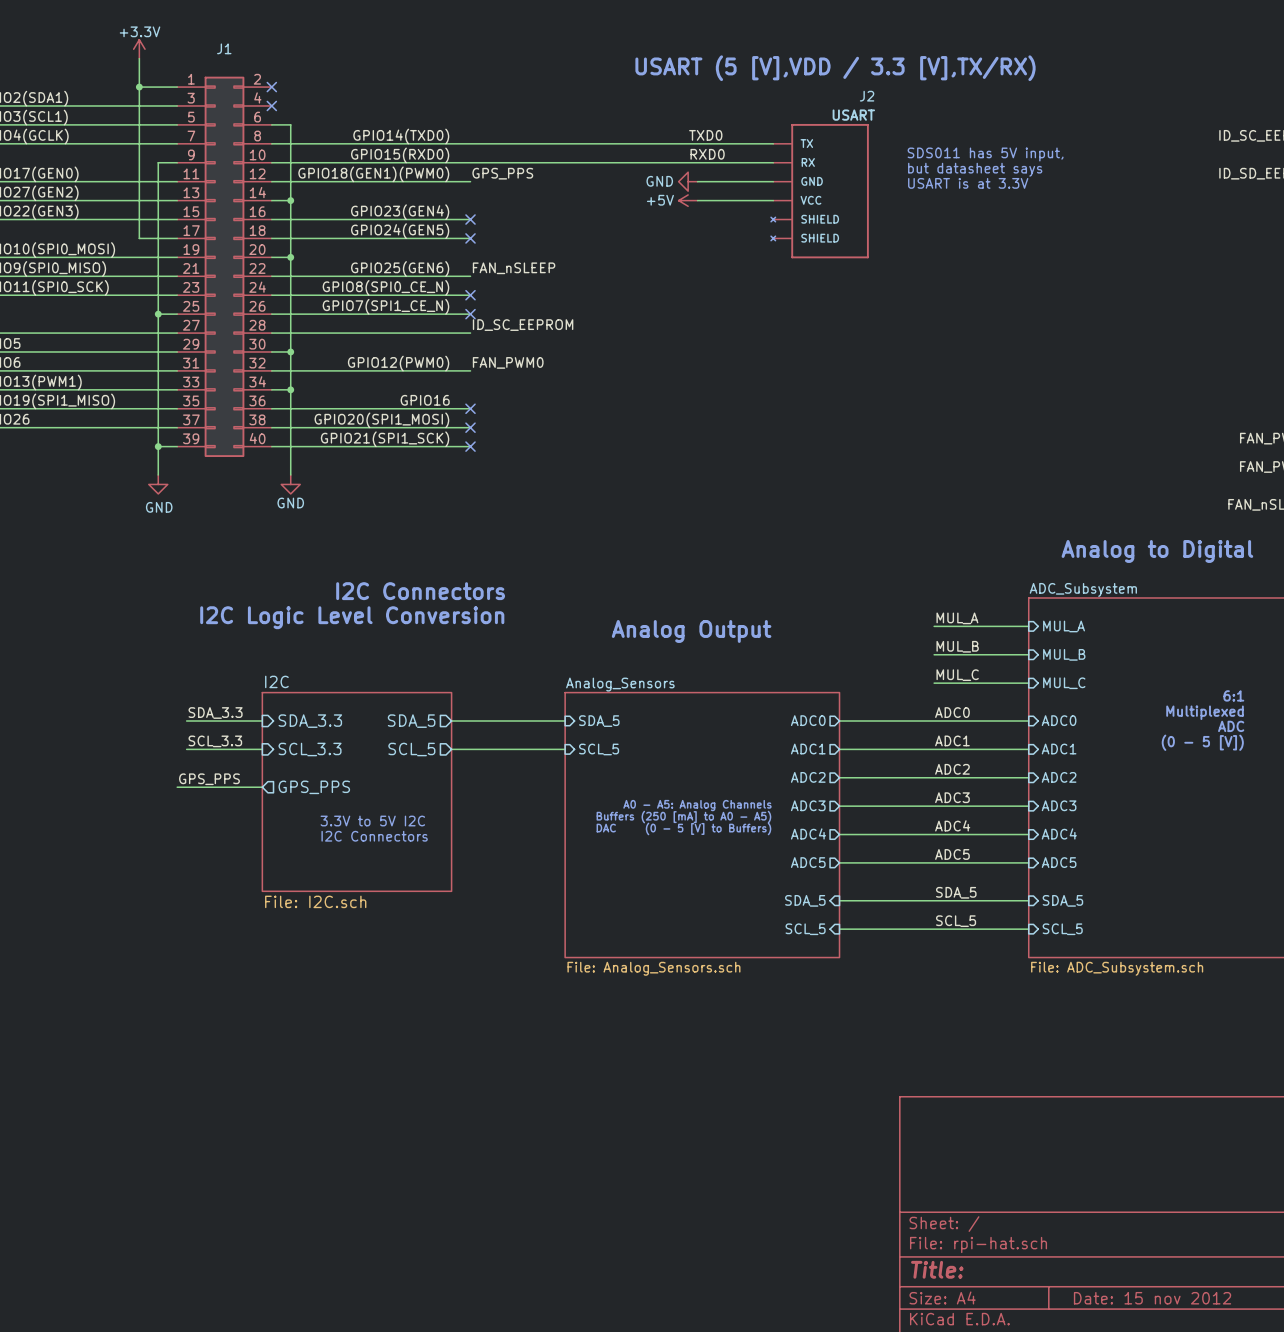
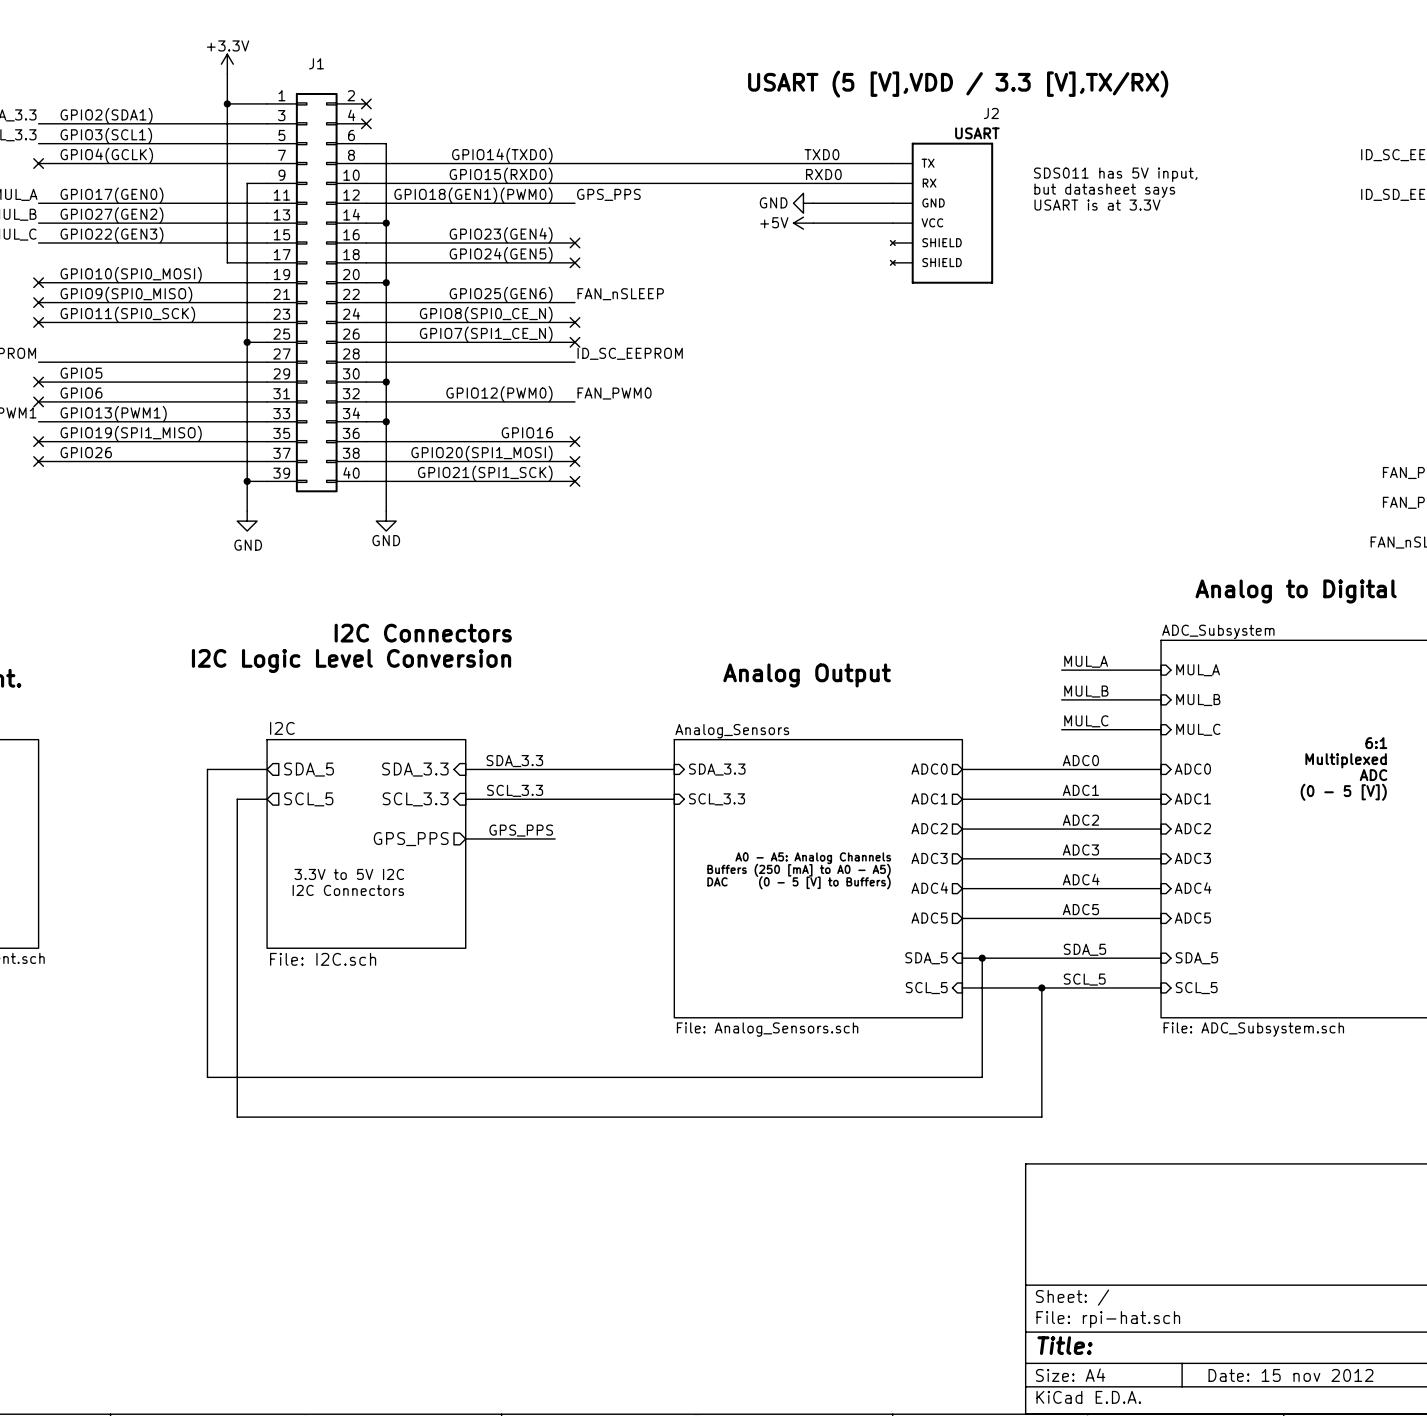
text position: I2C Connectors (420, 591) -> I2C Connectors (423, 633)
text position: I2C Logic Level Conversion (352, 617) -> I2C Logic Level Conversion (351, 661)
label: SDA_3.3 (215, 713) -> none
label: none -> SDA_3.3 (514, 761)
wire: none -> (267, 769) (207, 769) (207, 1077) (982, 1077) (982, 958)
wire: (186, 720) (262, 720) -> none
wire: none -> (465, 769) (555, 769)
sheet pin: none -> SDA_5 (309, 769)
sheet pin rotation: 0° (310, 721) -> 180° (415, 769)
sheet pin: SDA_5 (411, 721) -> none
sheet pin: SDA_5 (599, 721) -> SDA_3.3 (717, 769)
label: SCL_3.3 (215, 741) -> none
label: none -> SCL_3.3 (515, 790)
wire: none -> (267, 799) (237, 799) (237, 1117) (1041, 1117) (1041, 987)
wire: (186, 749) (262, 749) -> none
sheet pin: none -> SCL_5 (308, 799)
sheet pin rotation: 0° (310, 749) -> 180° (415, 799)
wire: none -> (465, 799) (555, 799)
sheet pin: SCL_5 (411, 749) -> none
sheet pin: SCL_5 (599, 749) -> SCL_3.3 (717, 799)
label: GPS_PPS (209, 779) -> none
label: none -> GPS_PPS (521, 830)
wire: (177, 787) (262, 787) -> none
sheet pin rotation: 0° (314, 787) -> 180° (411, 839)
wire: none -> (465, 838) (555, 838)
sheet I2C position: (356, 791) -> (366, 843)
text position: 3.3V to 5V I2C (372, 821) -> 3.3V to 5V I2C (349, 874)
text position: I2C Connectors (374, 836) -> I2C Connectors (348, 890)
junction: none -> (982, 958)
junction: none -> (1041, 987)

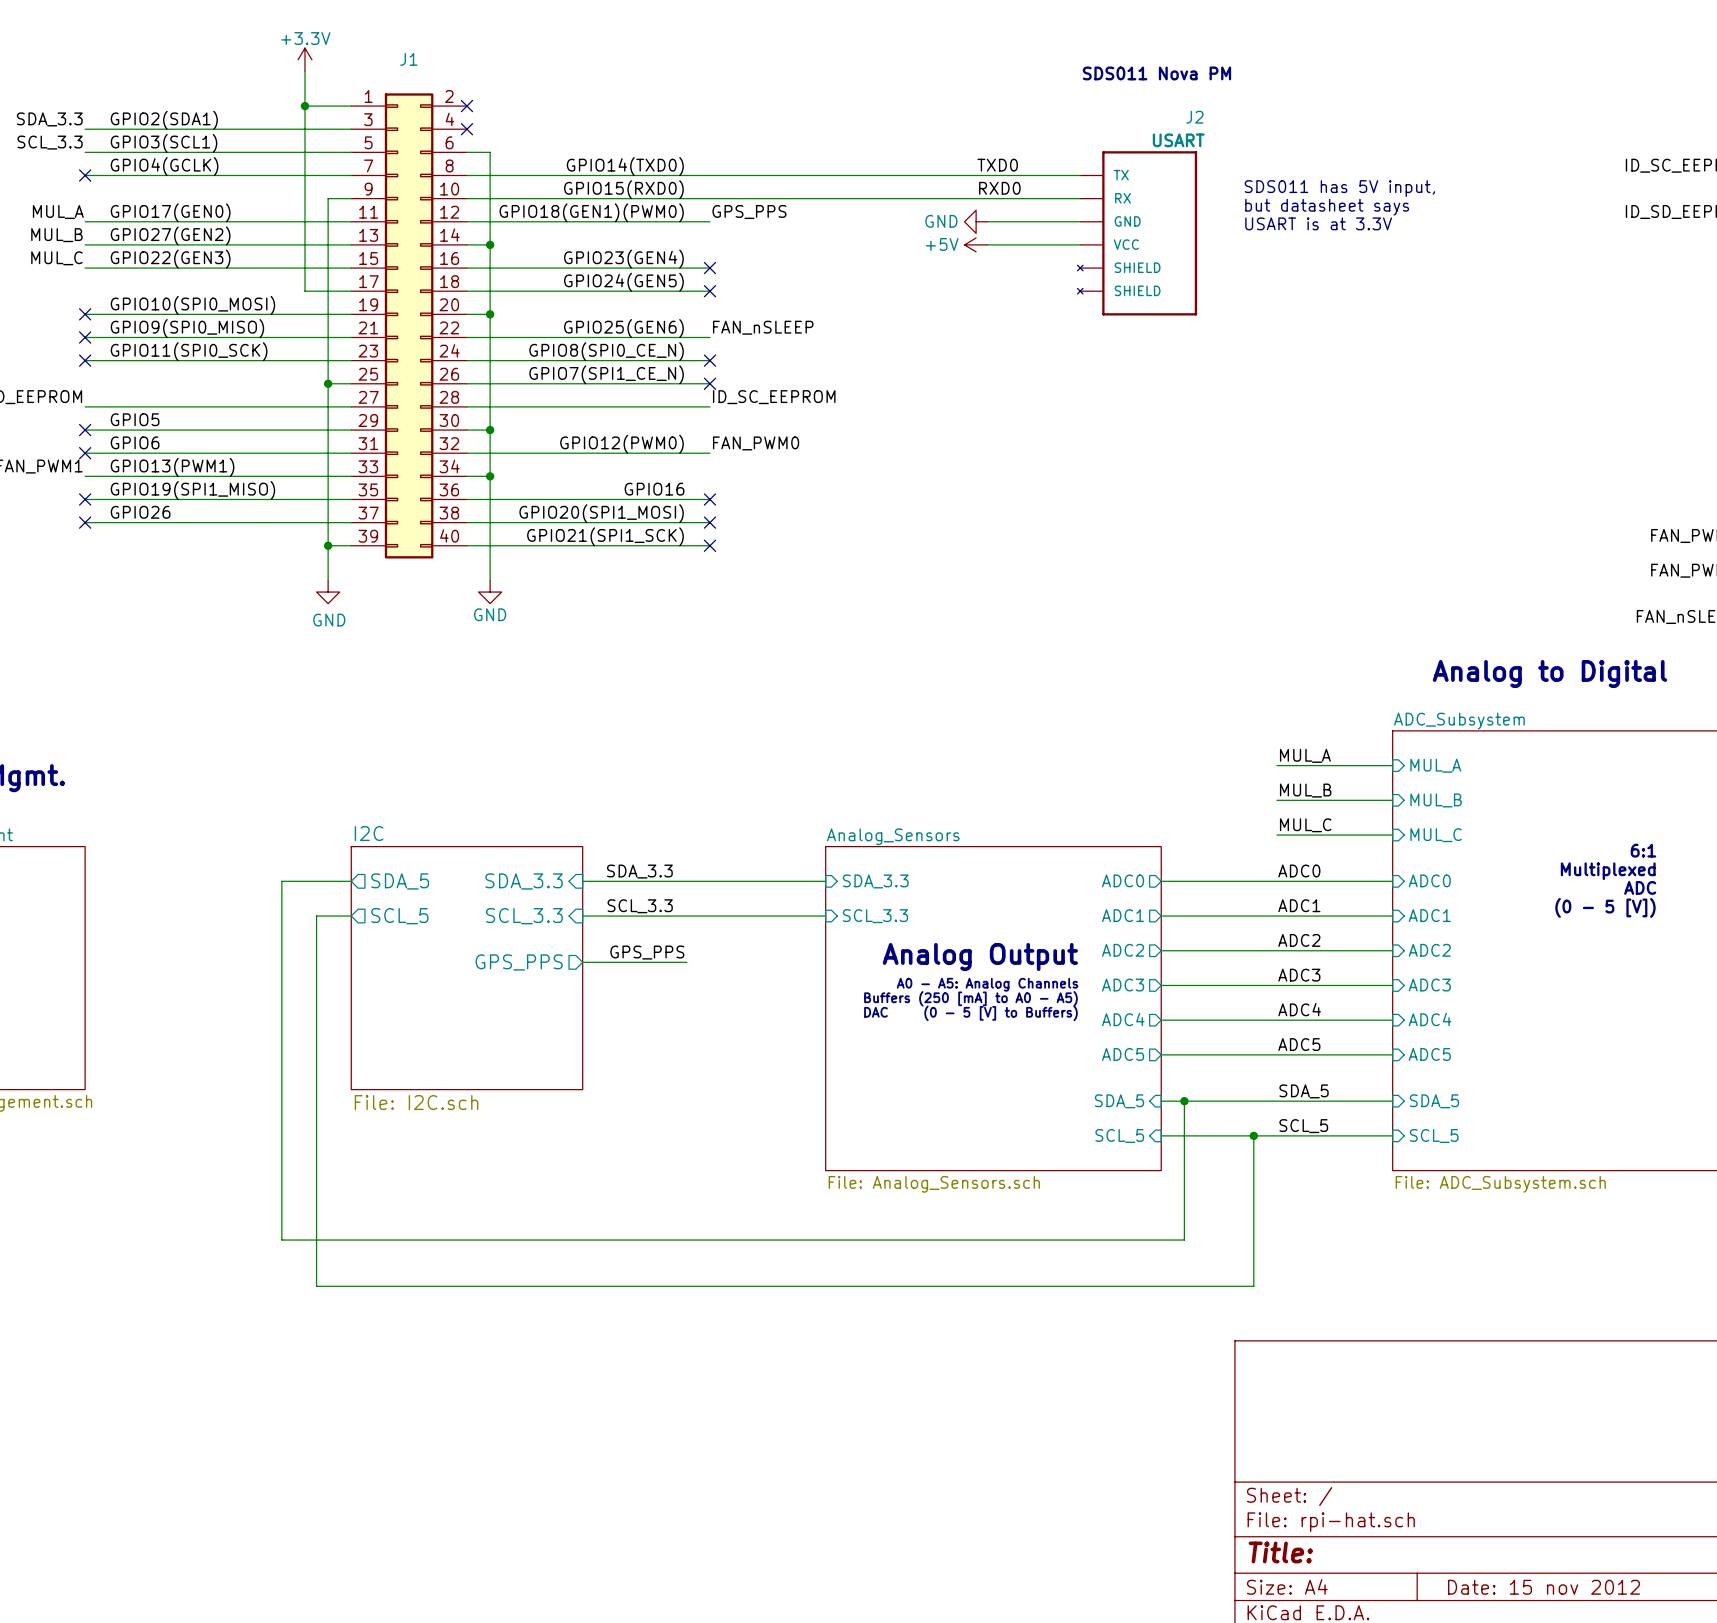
text: none -> SDS011 Nova PM (1156, 73)
text: USART (5 [V],VDD / 3.3 [V],TX/RX) (958, 84) -> none
text: I2C Connectors (423, 633) -> none
text: I2C Logic Level Conversion (351, 661) -> none
text position: Analog Output (807, 675) -> Analog Output (980, 956)
text: 3.3V to 5V I2C (349, 874) -> none
text: I2C Connectors (348, 890) -> none

